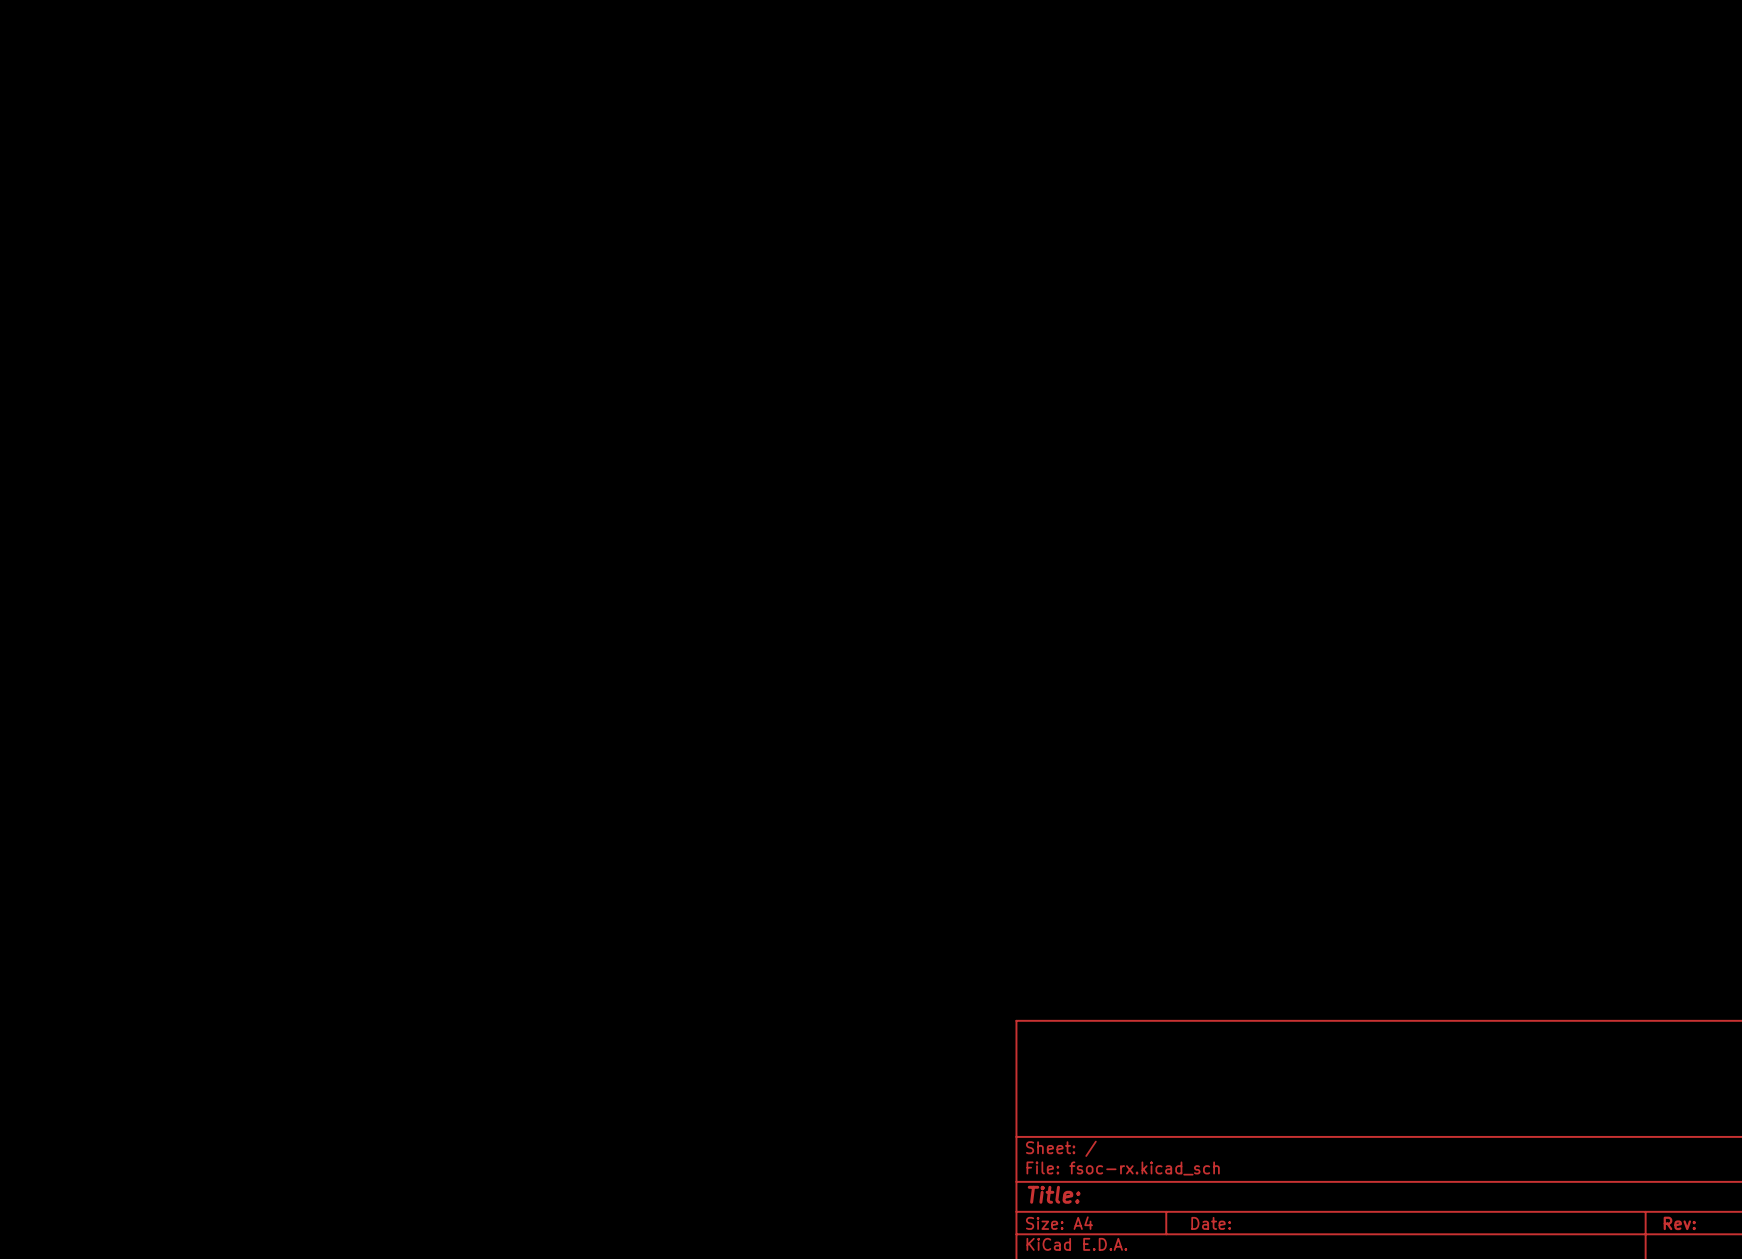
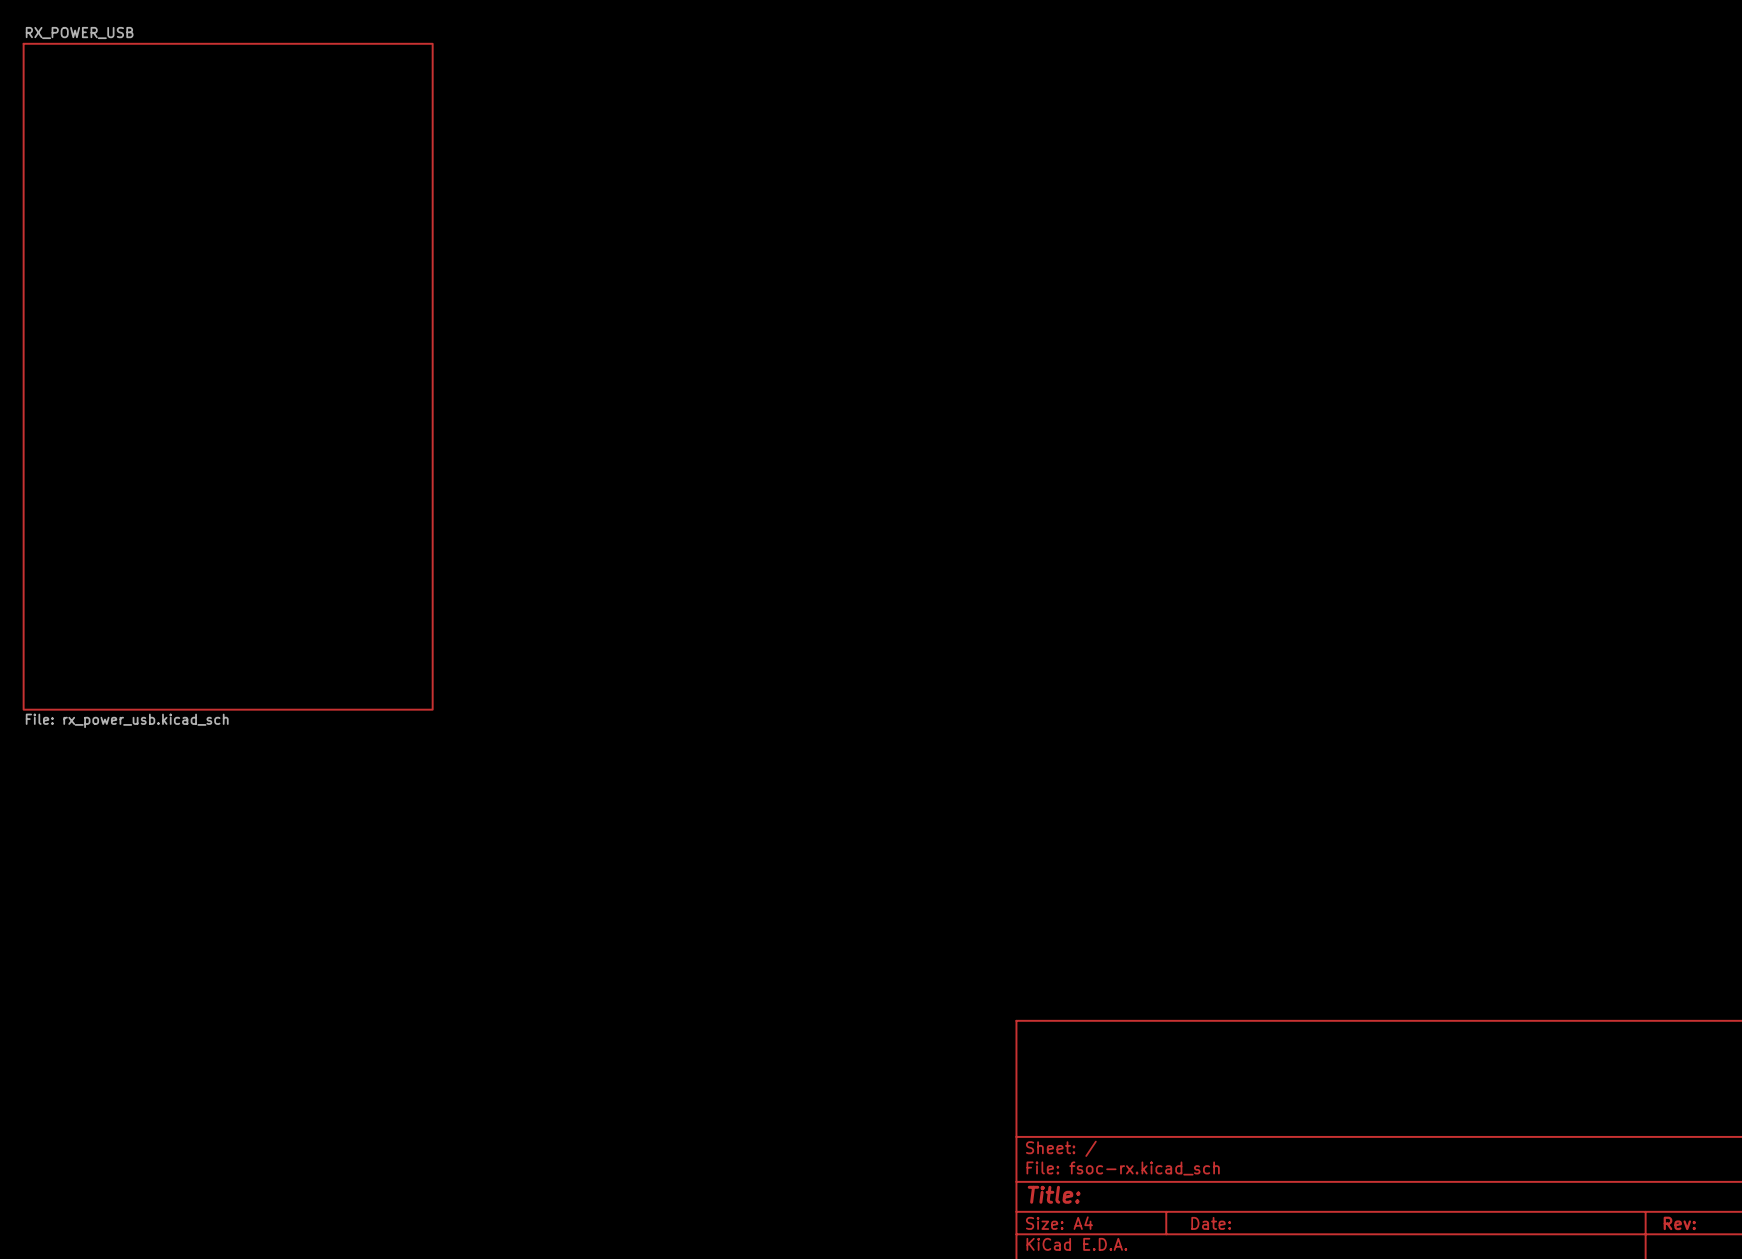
sheet RX_POWER_USB: none -> File: rx_power_usb.kicad_sch (228, 376)

